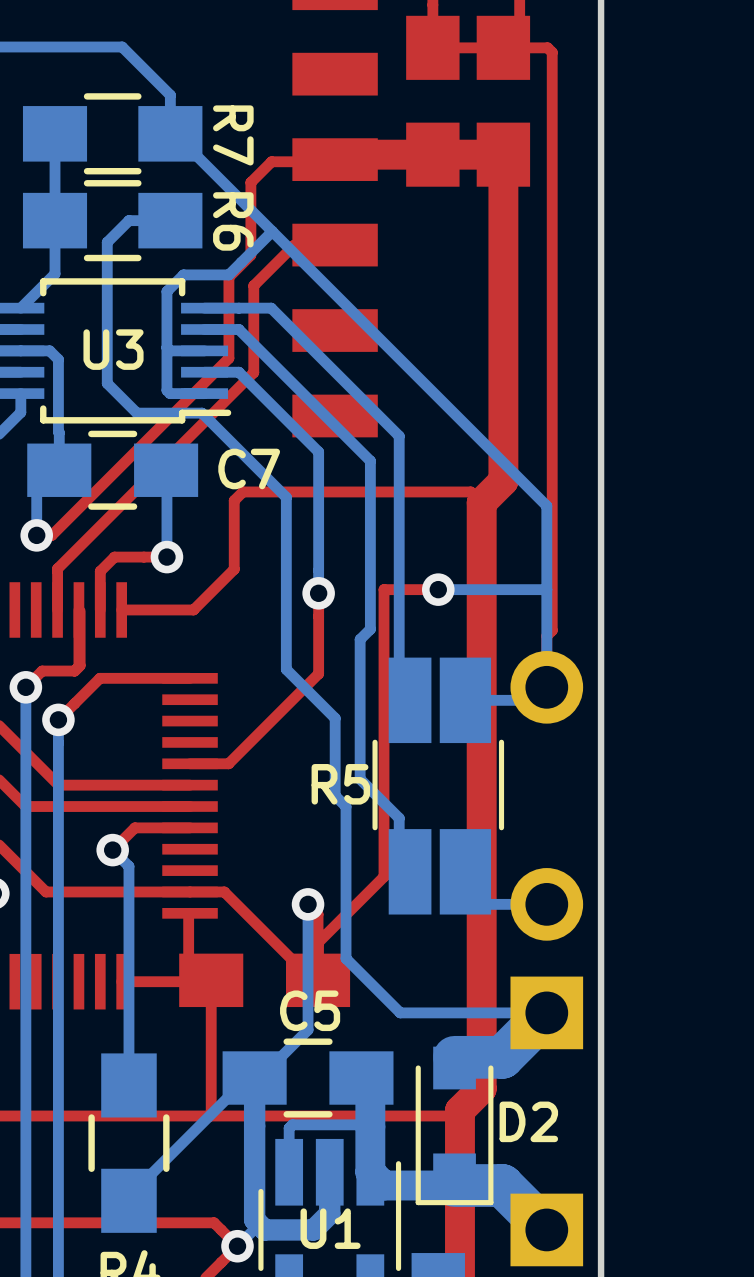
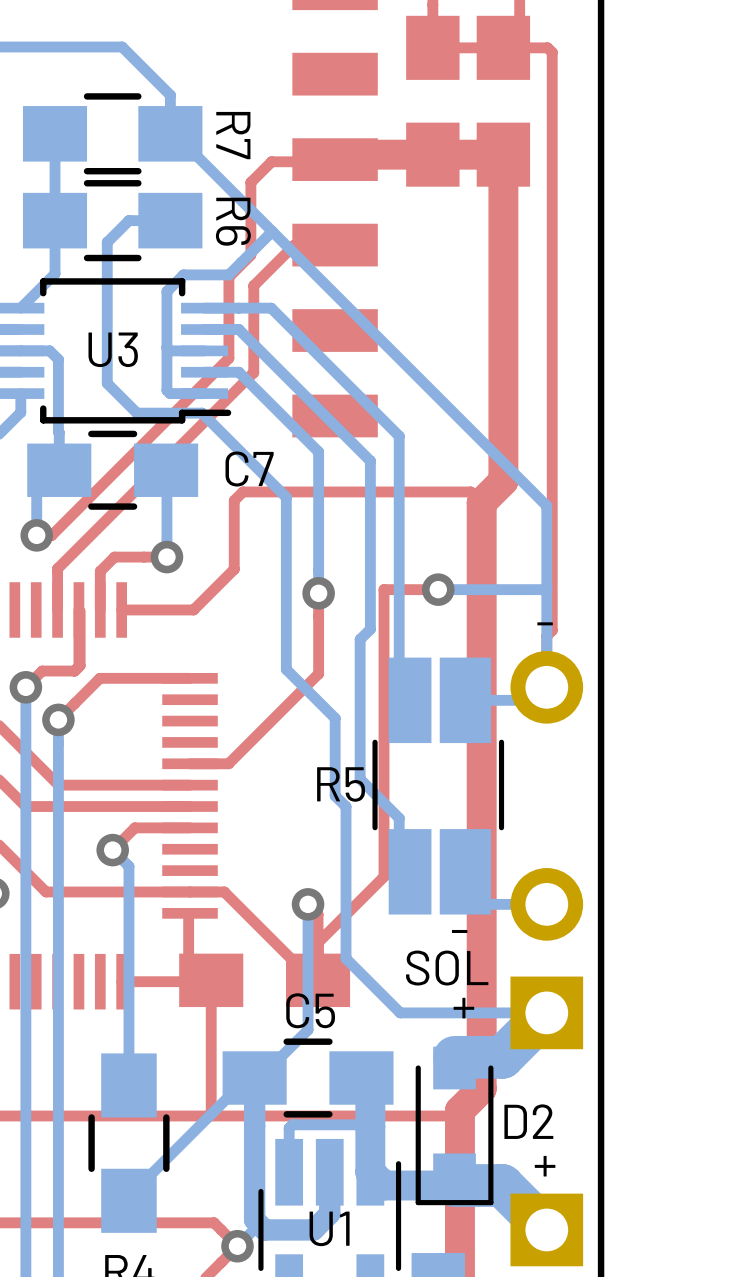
text: none -> - (545, 623)
text: none -> - (459, 931)
text: none -> SOL (447, 968)
text: none -> + (463, 1008)
text: none -> + (545, 1166)

